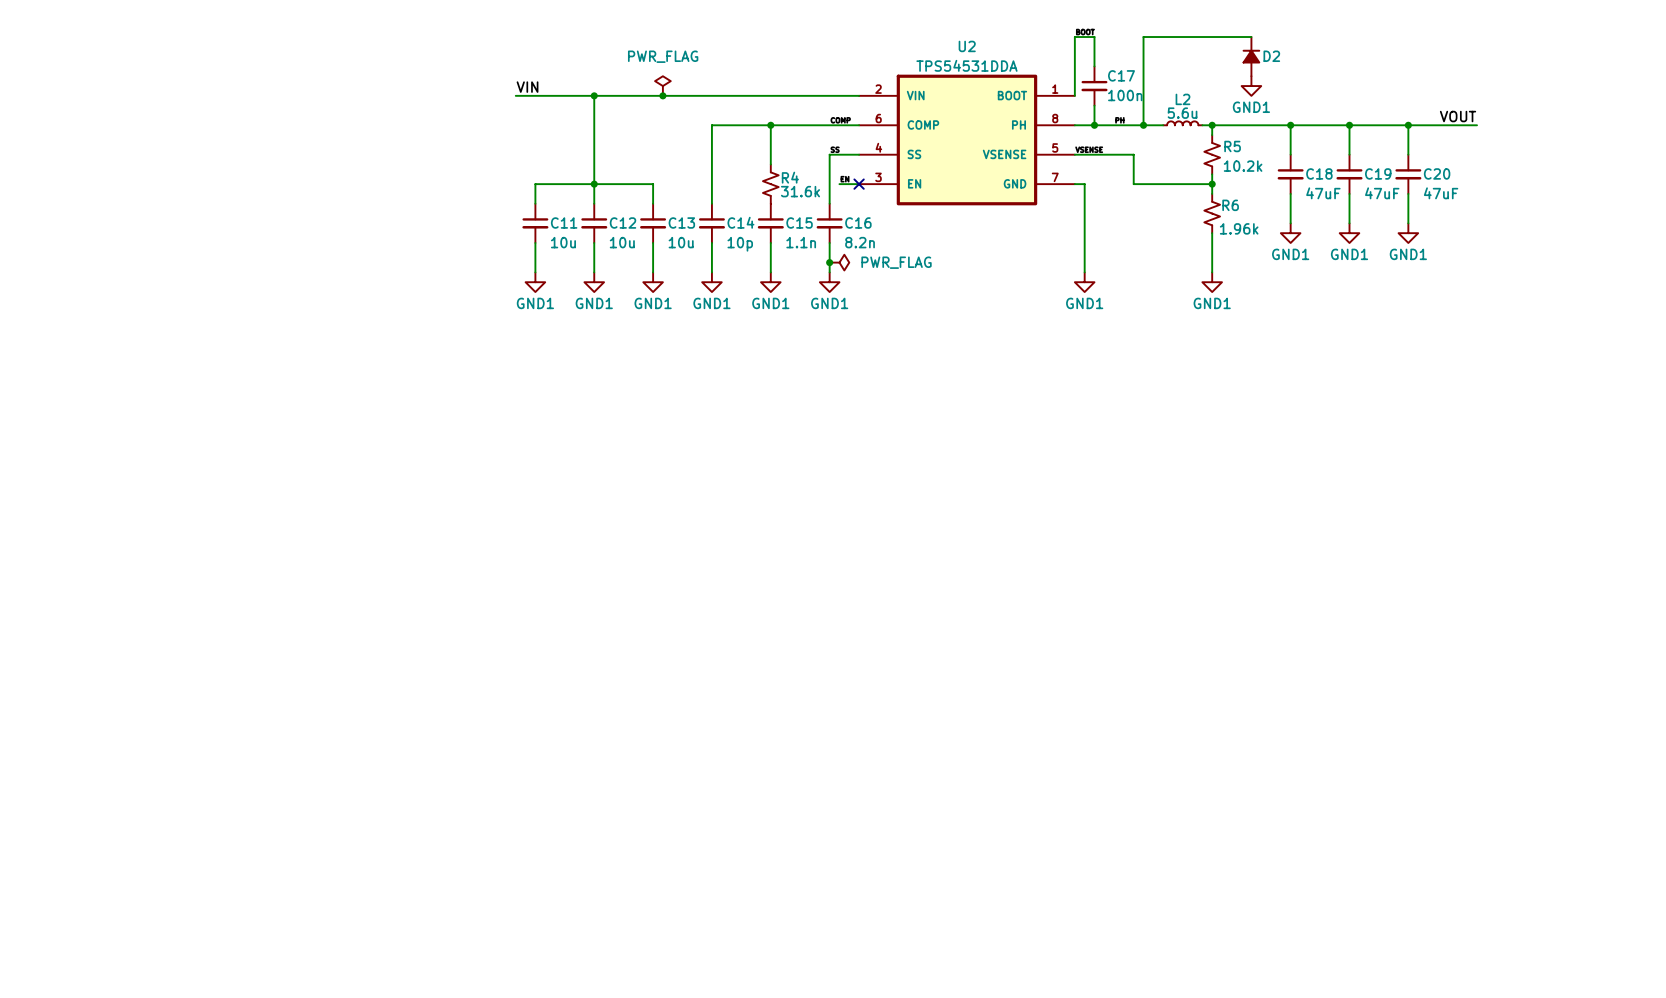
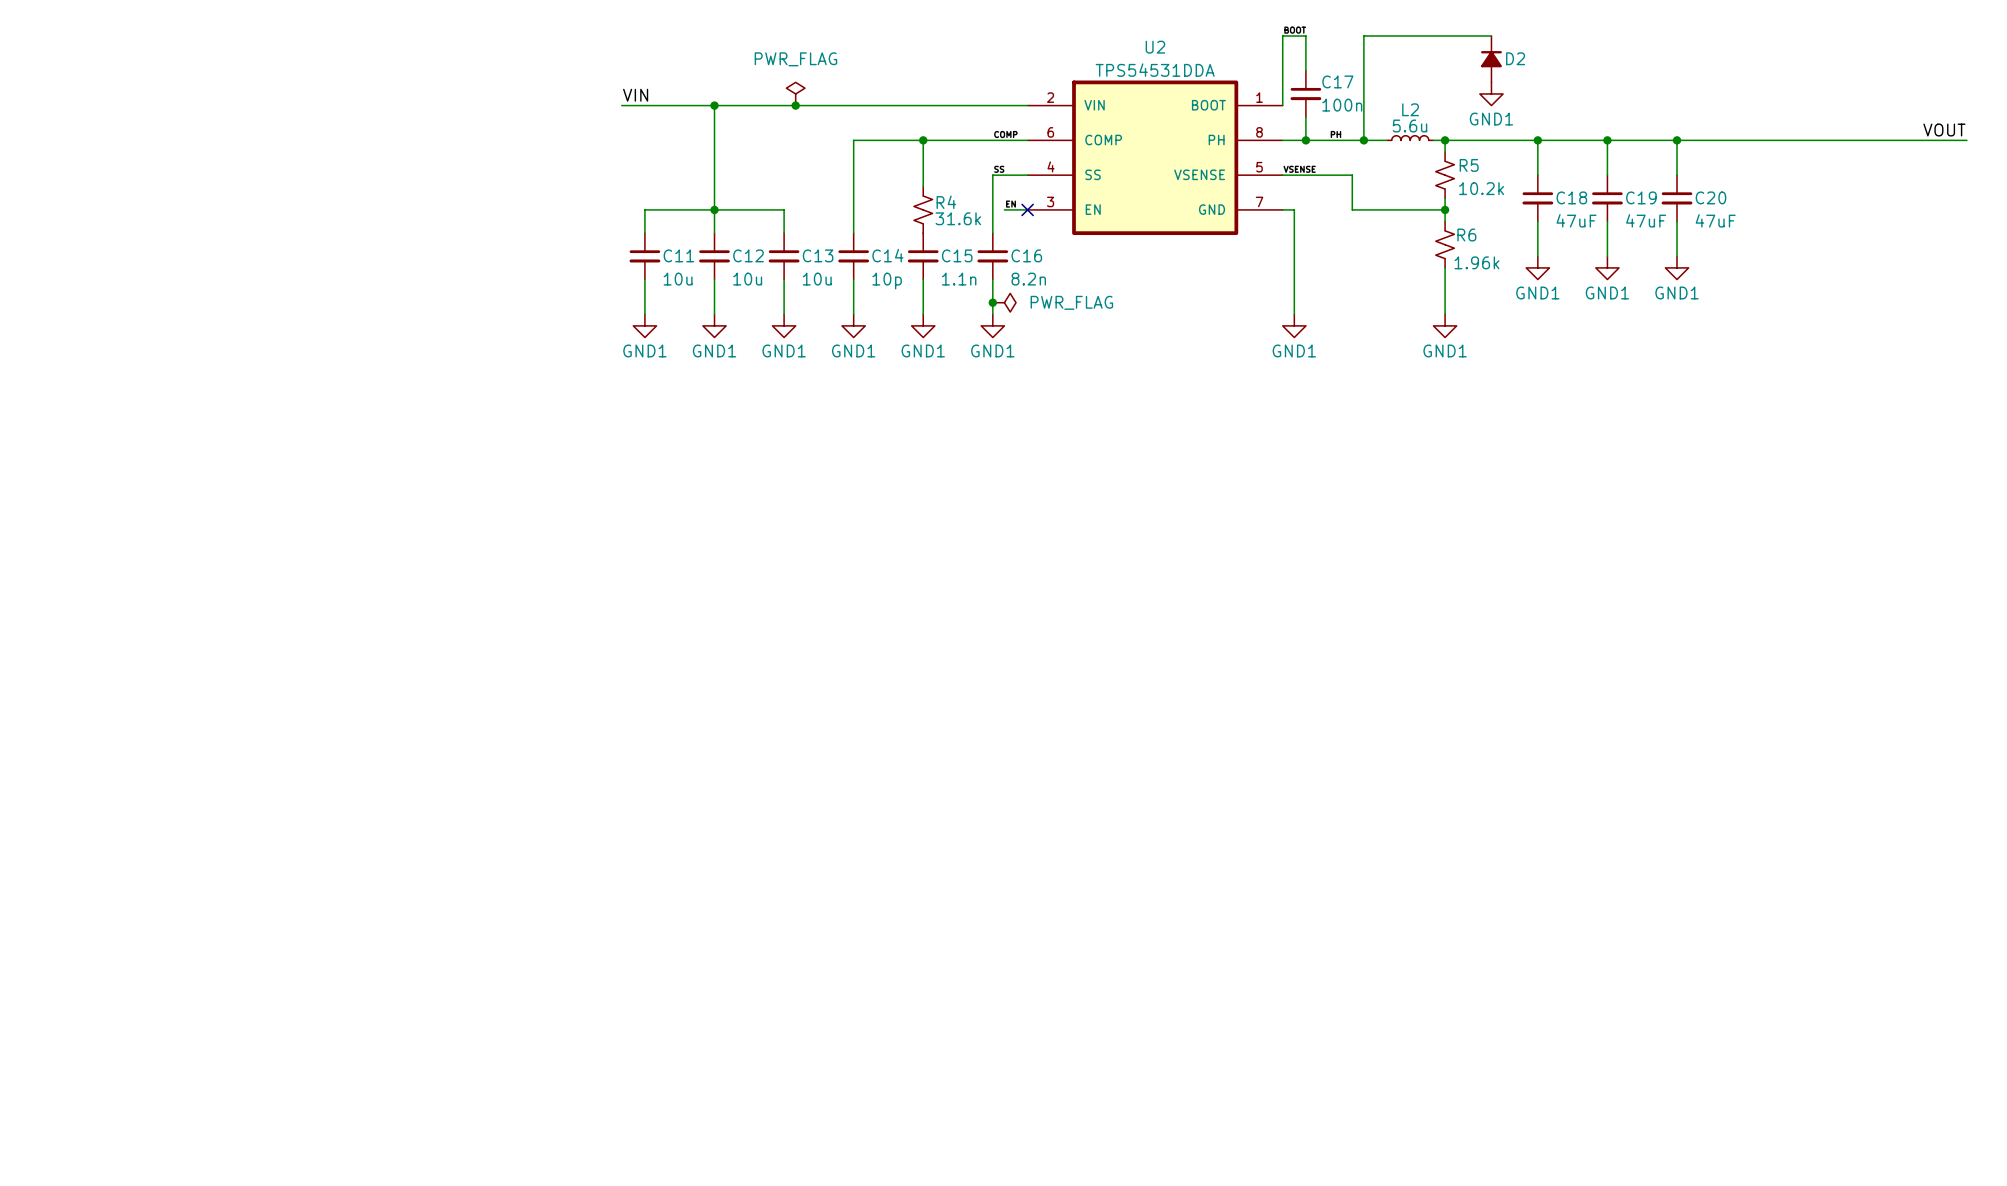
label position: VOUT (1458, 116) -> VOUT (1944, 130)
wire: none -> (1758, 140) (1966, 140)

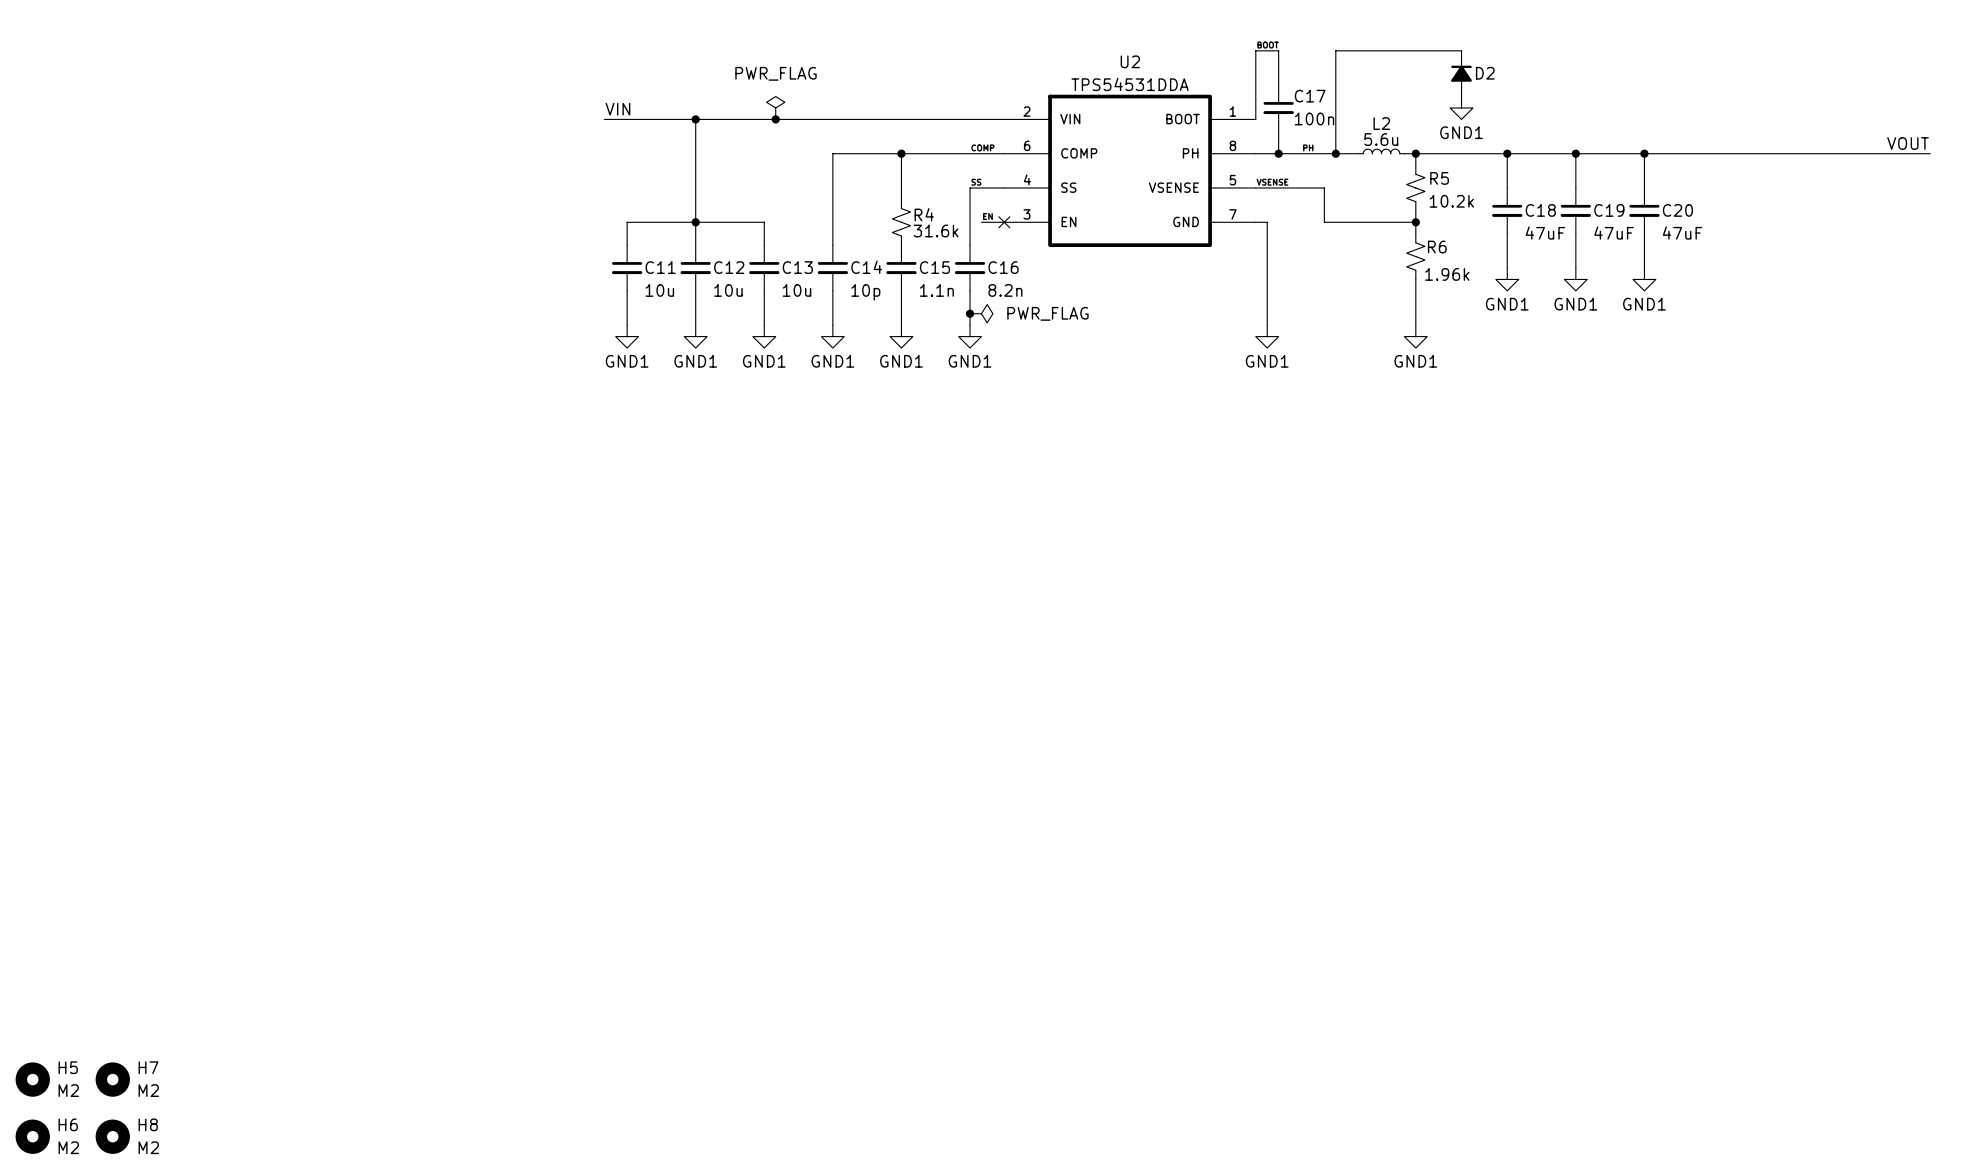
H5: none -> M2 (32, 1079)
H7: none -> M2 (112, 1079)
H6: none -> M2 (32, 1136)
H8: none -> M2 (112, 1136)

